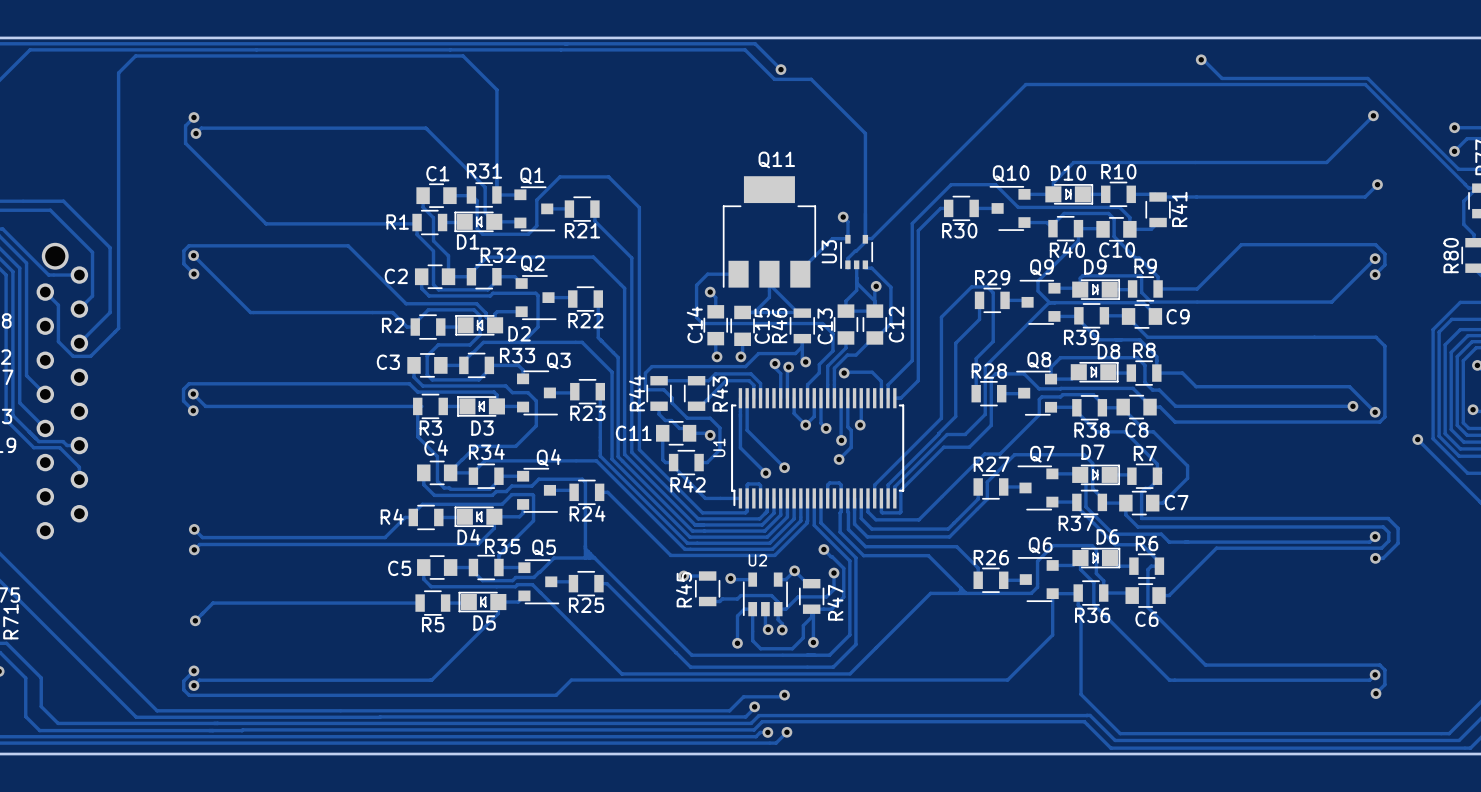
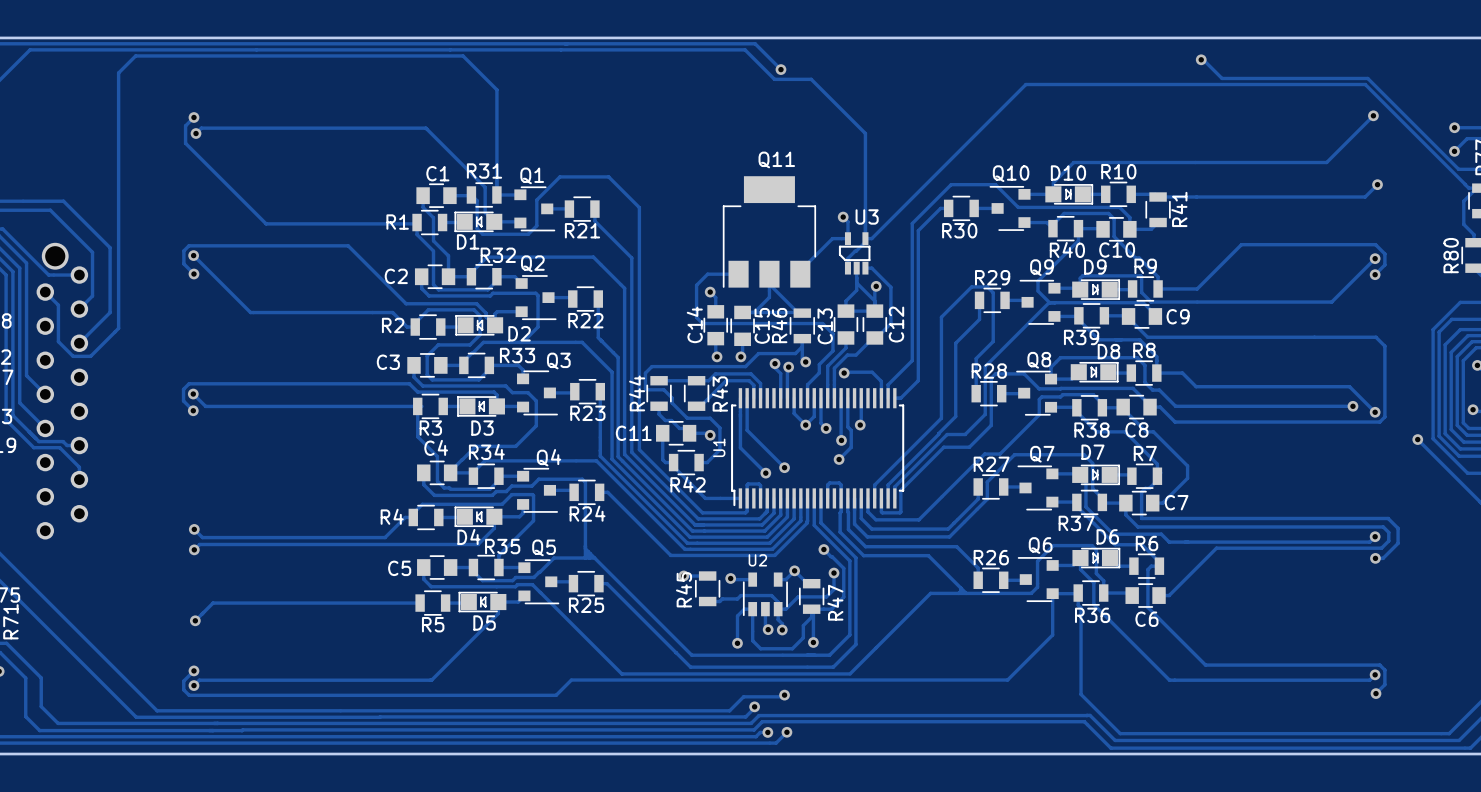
U3 footprint: [840, 234, 874, 270] -> [838, 232, 871, 275]
U3 name position: U3 (829, 251) -> U3 (867, 216)

